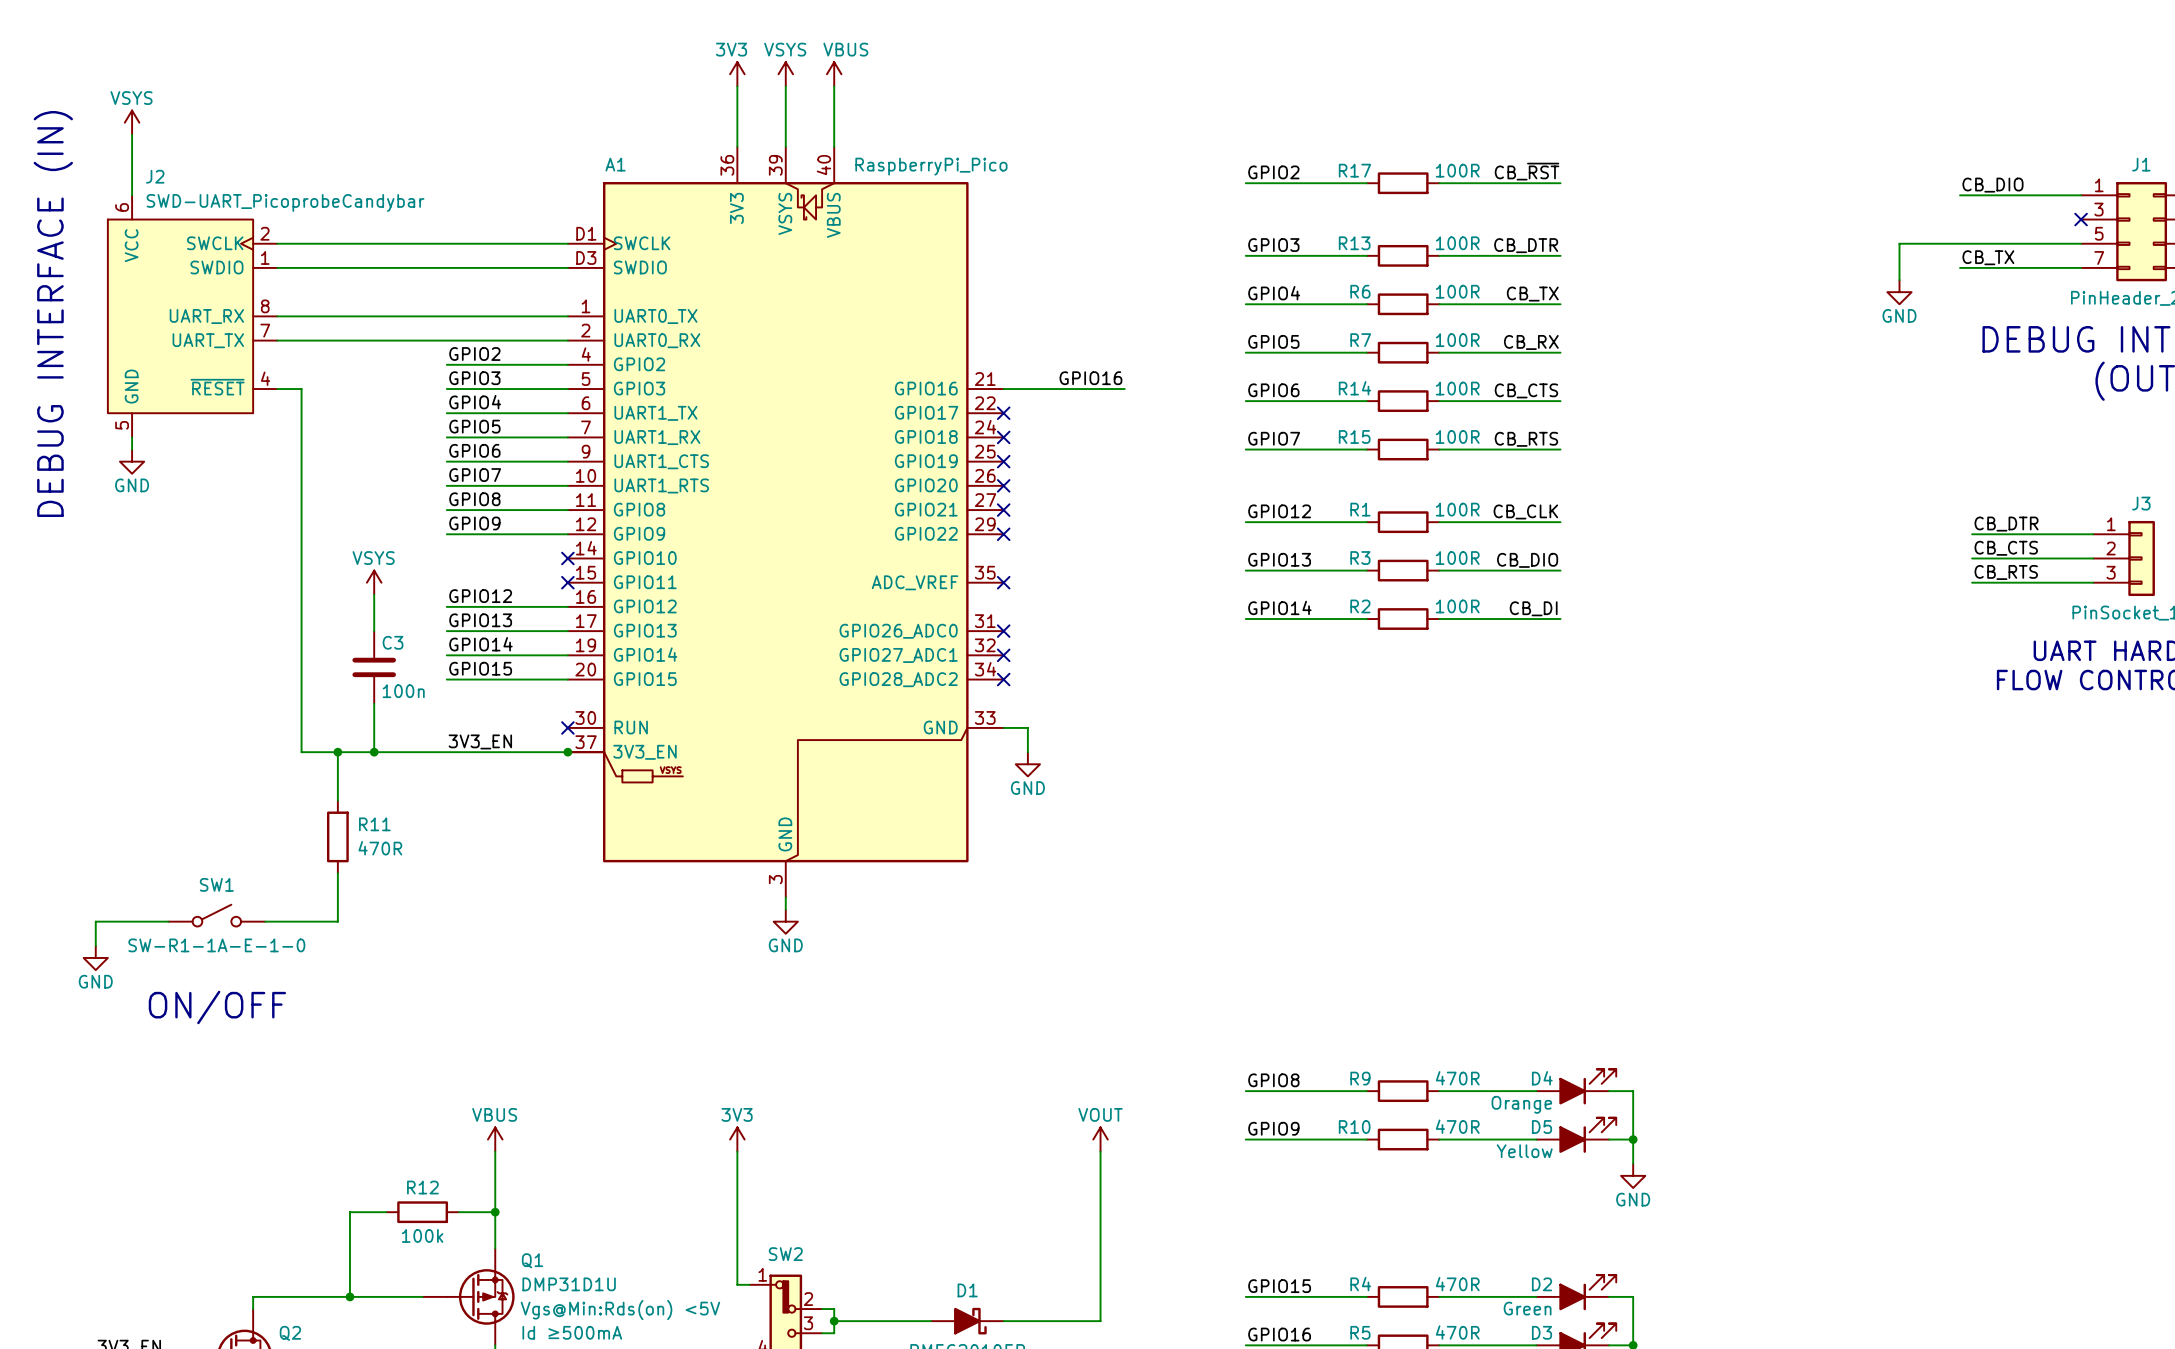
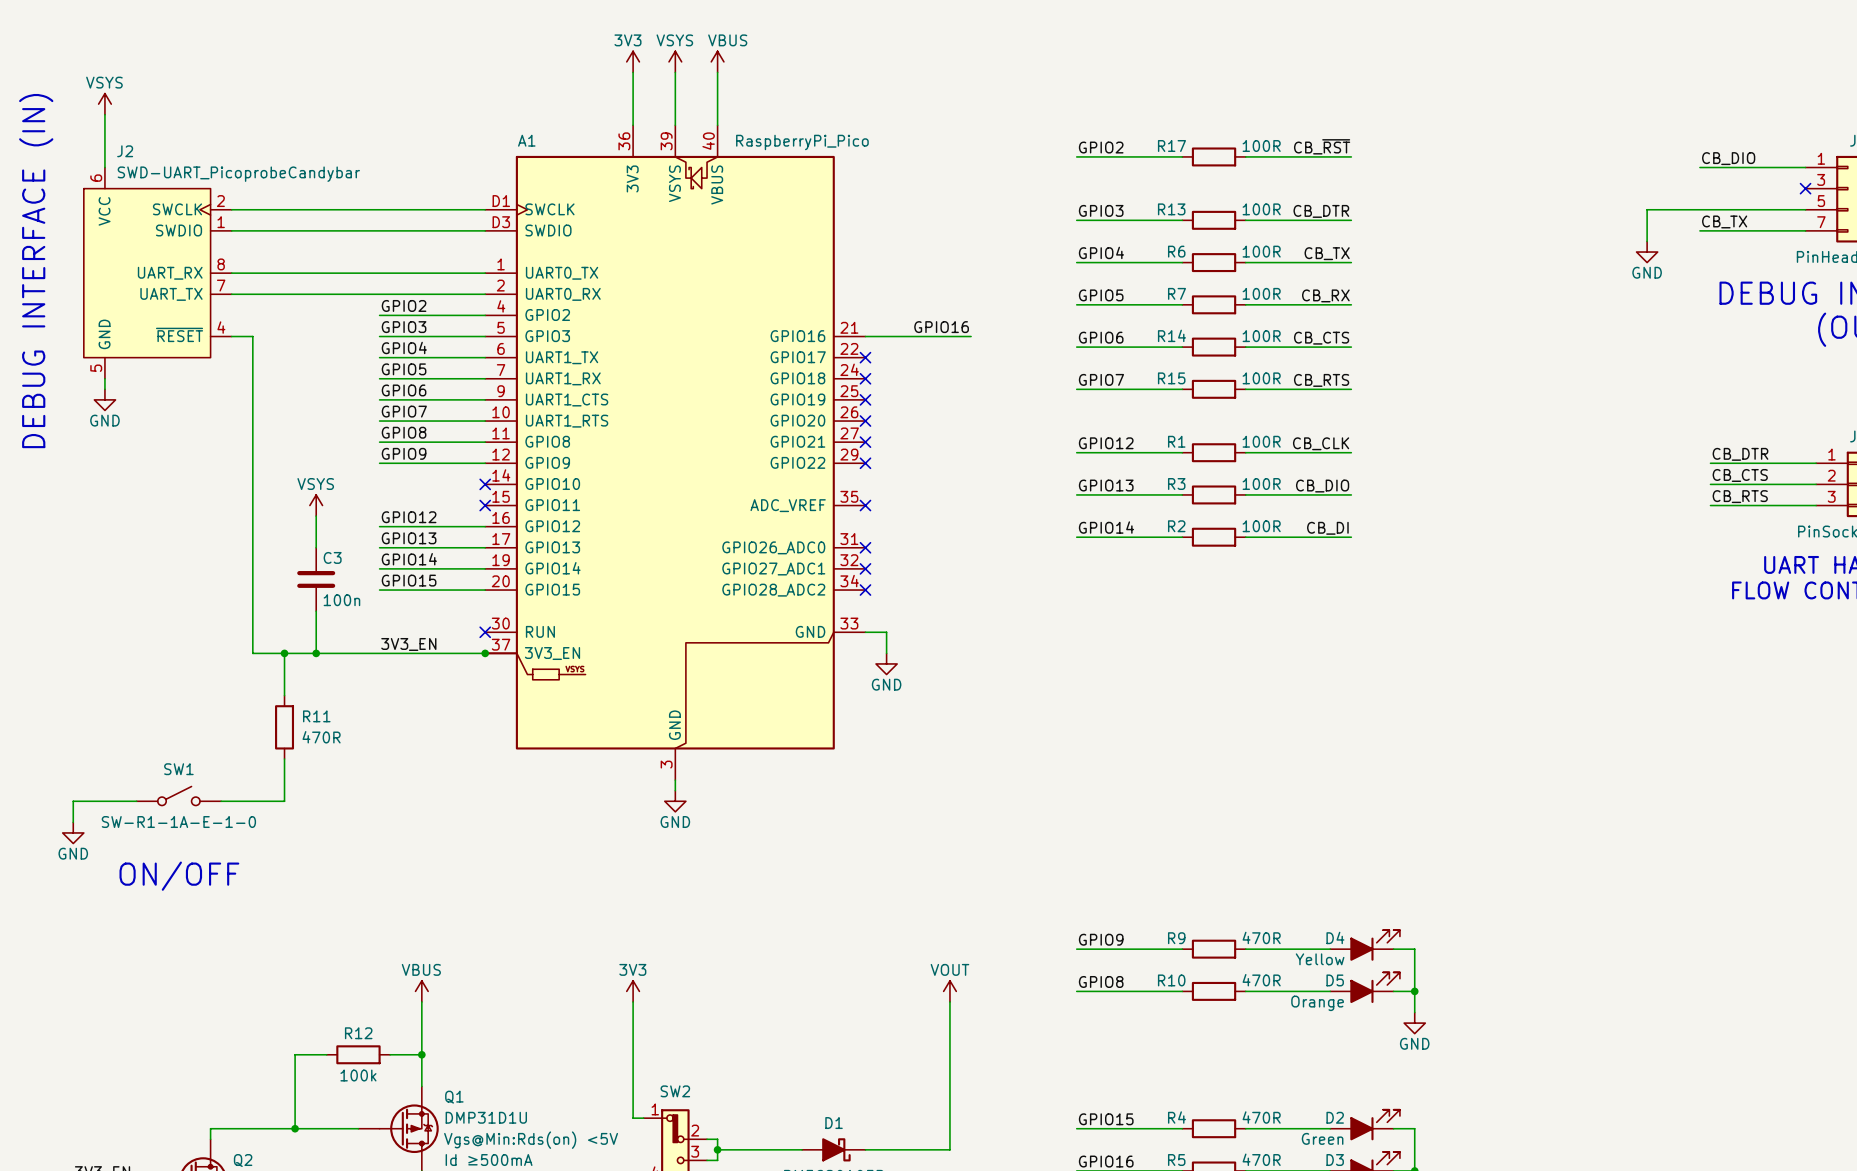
label: GPIO8 (1273, 1080) -> GPIO9 (1101, 939)
D4 value: Orange (1521, 1104) -> Yellow (1320, 959)
label: GPIO9 (1273, 1128) -> GPIO8 (1101, 981)
D5 value: Yellow (1524, 1151) -> Orange (1317, 1003)

